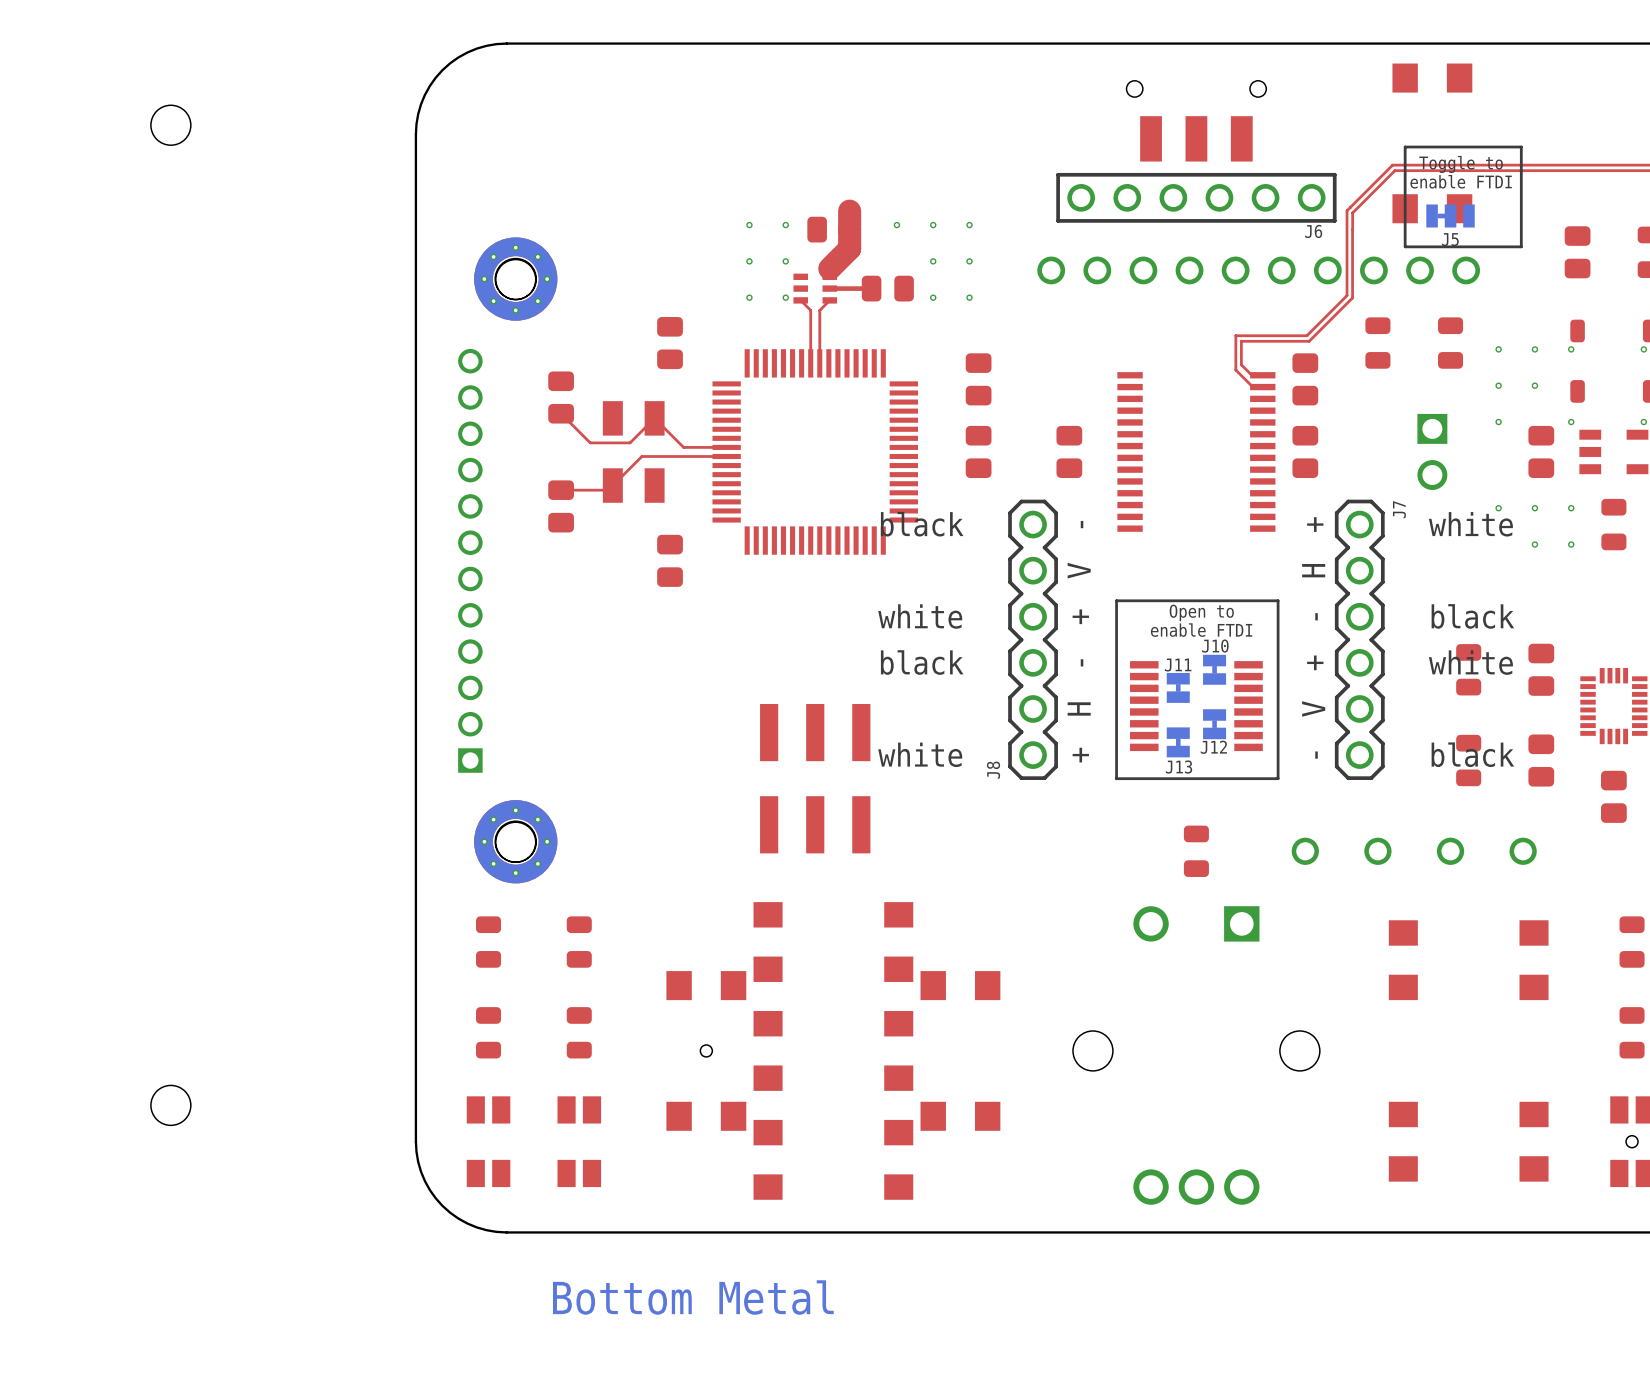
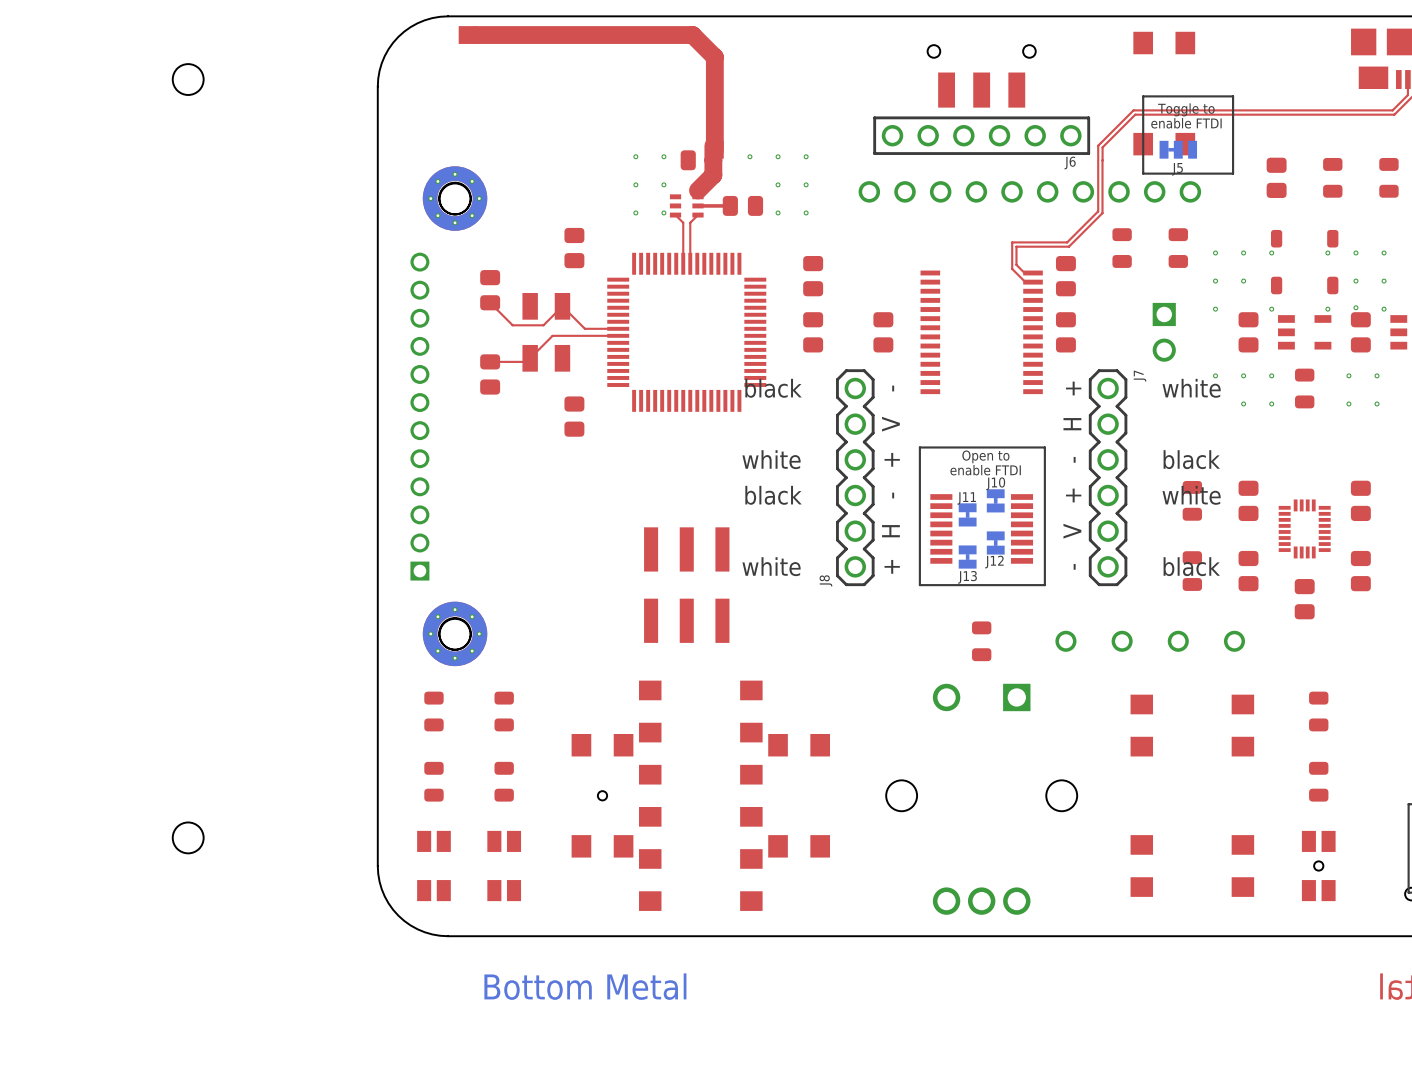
part: none -> (591, 92)

